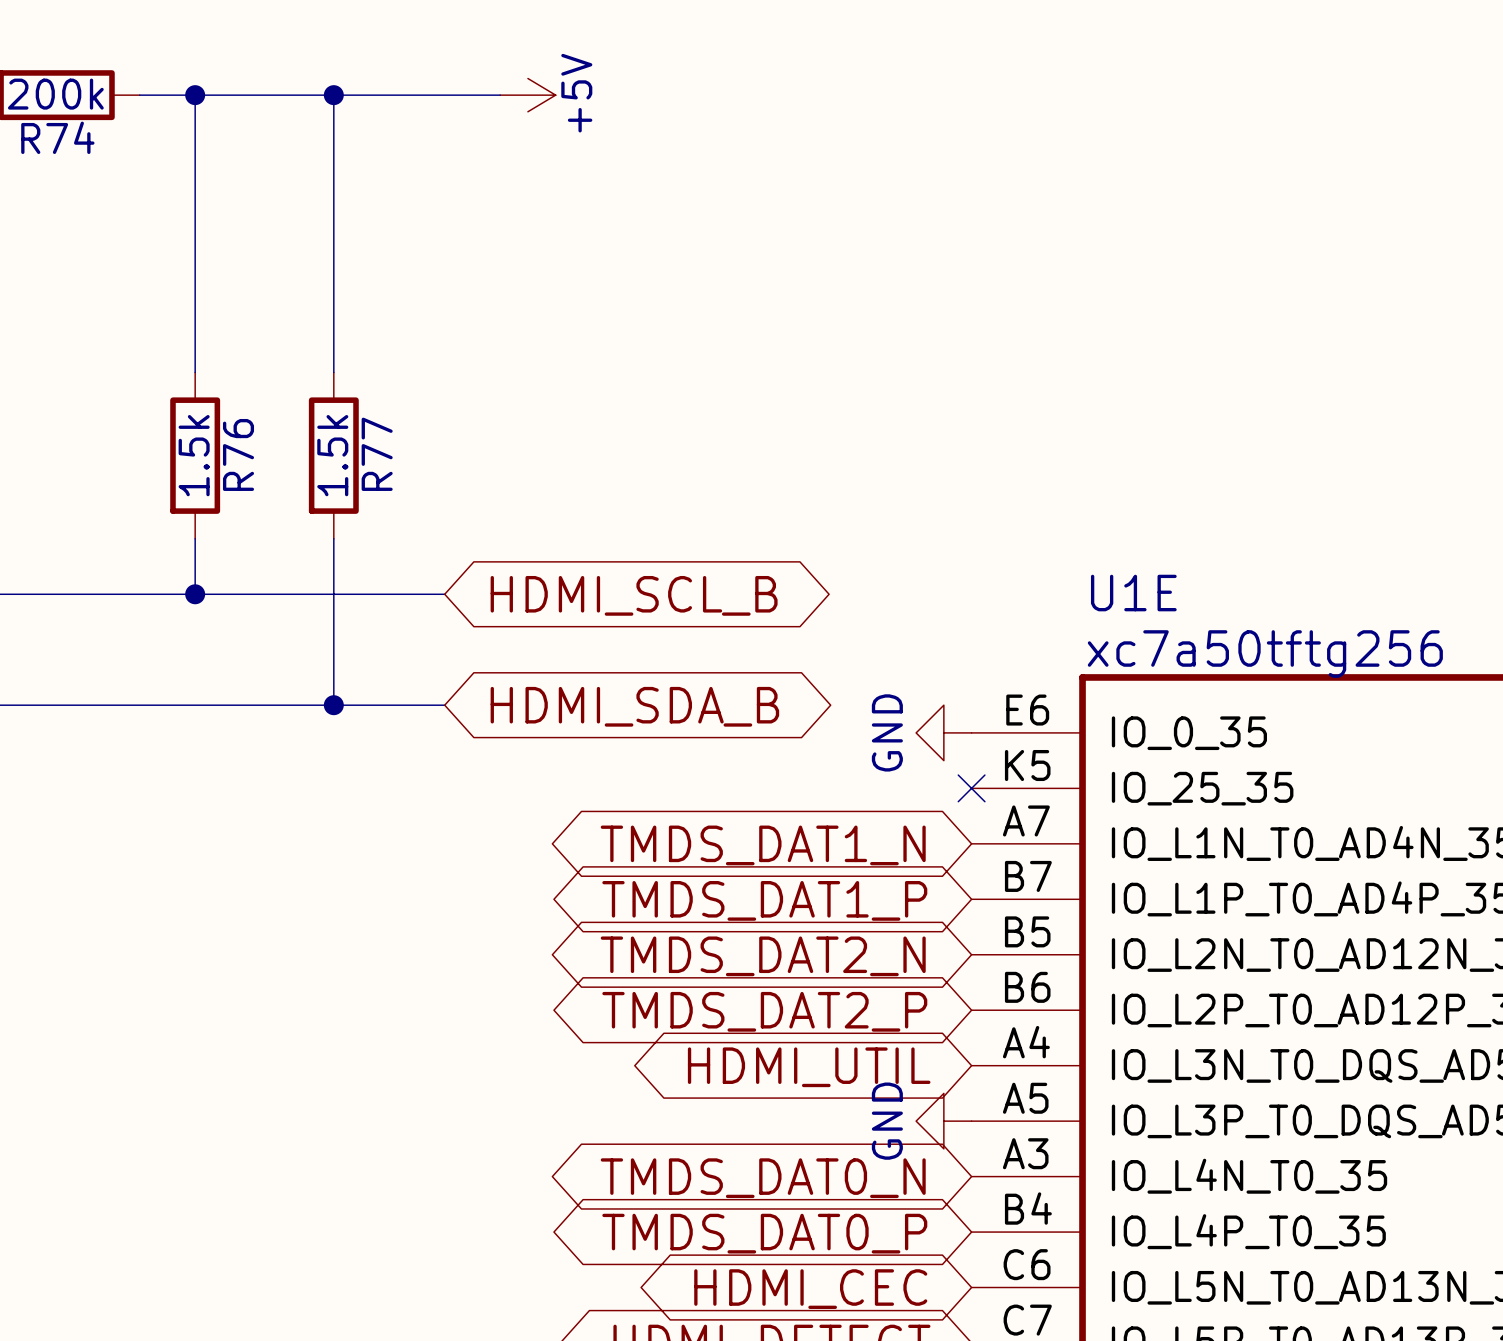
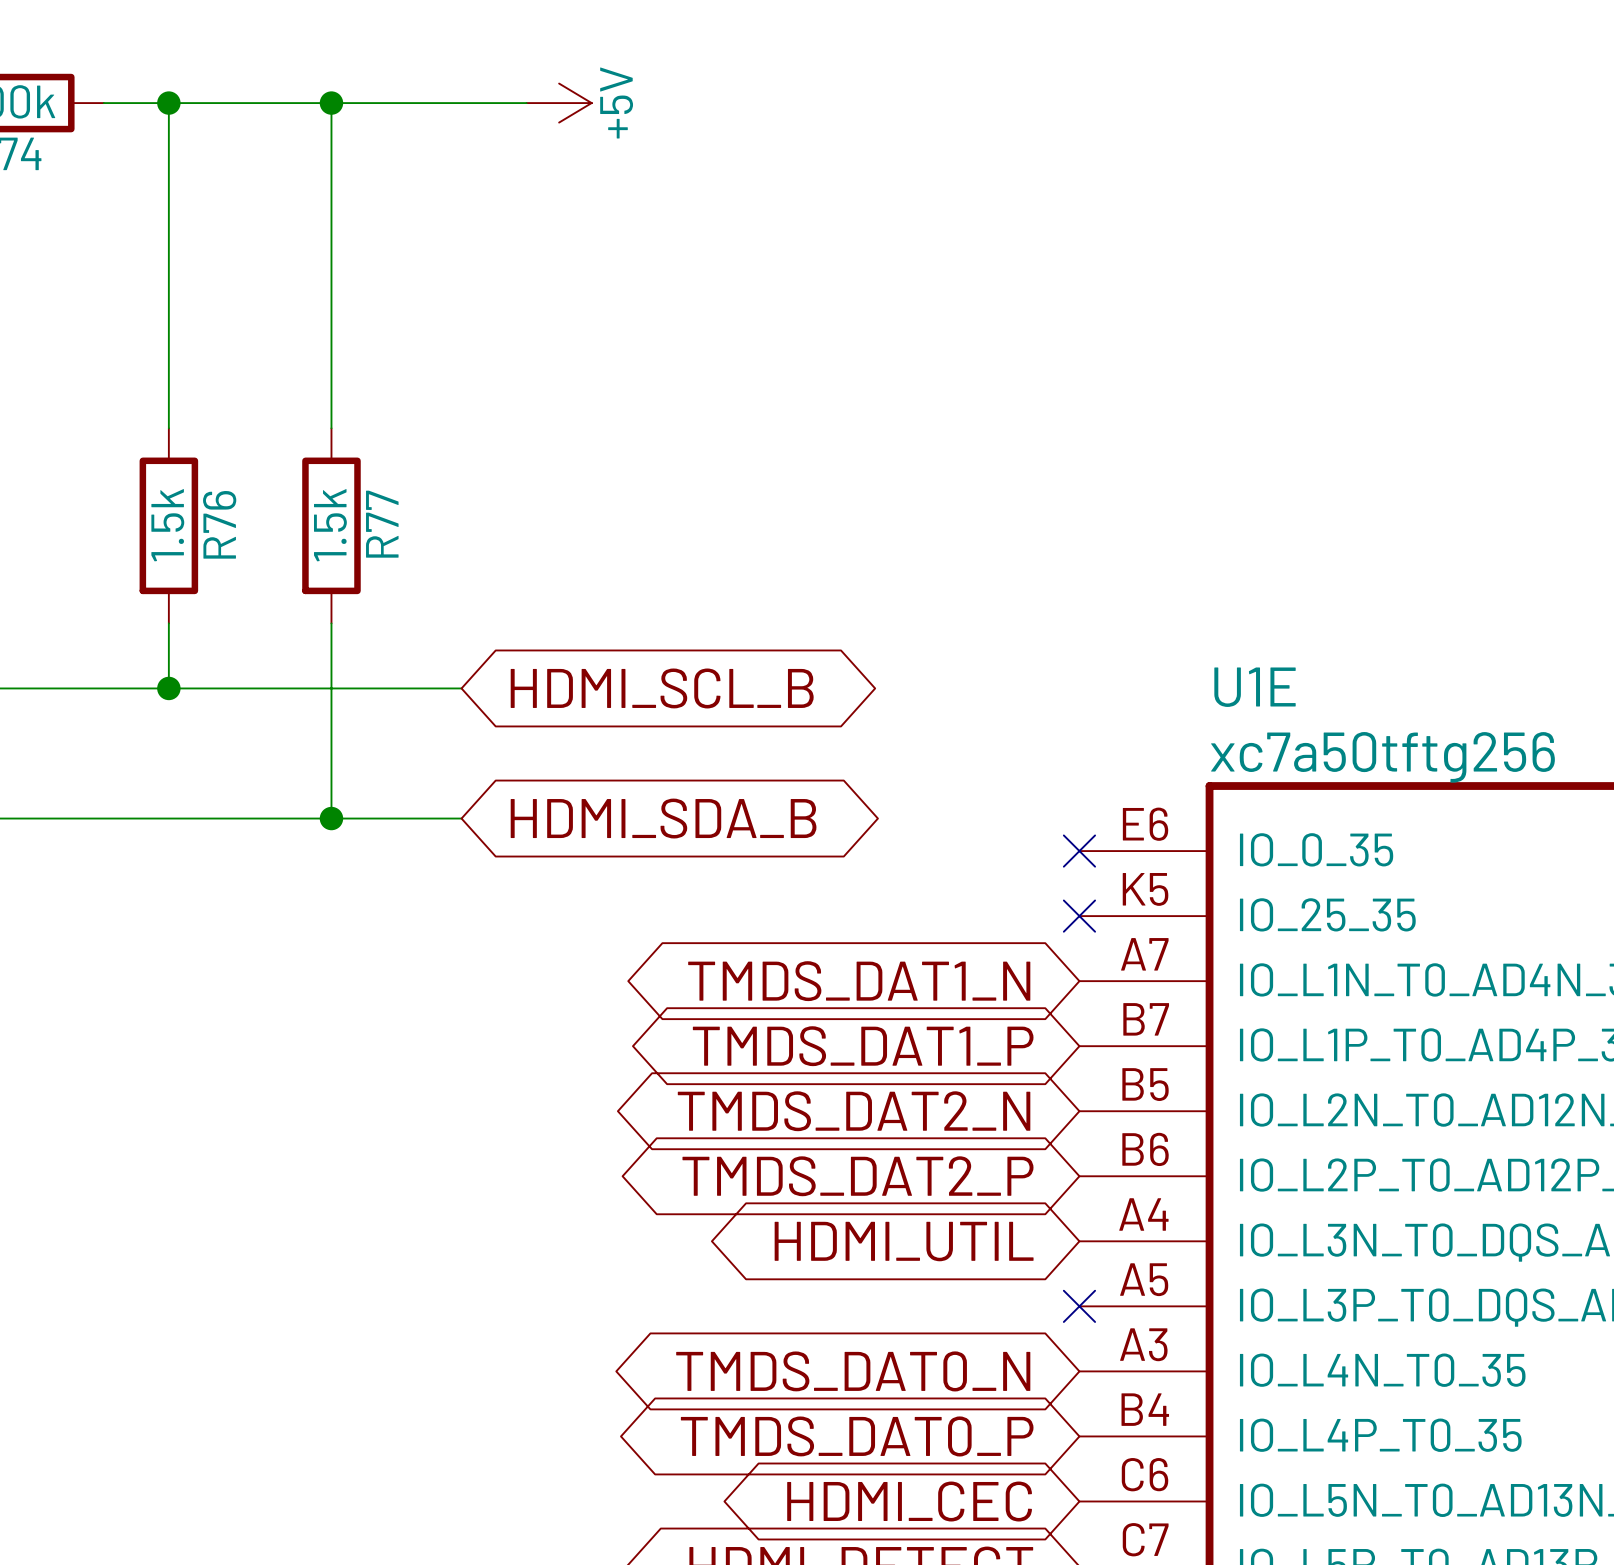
power symbol: GND (943, 732) -> none
no-connect mark: none -> (1079, 851)
power symbol: GND (943, 1121) -> none
no-connect mark: none -> (1079, 1306)

